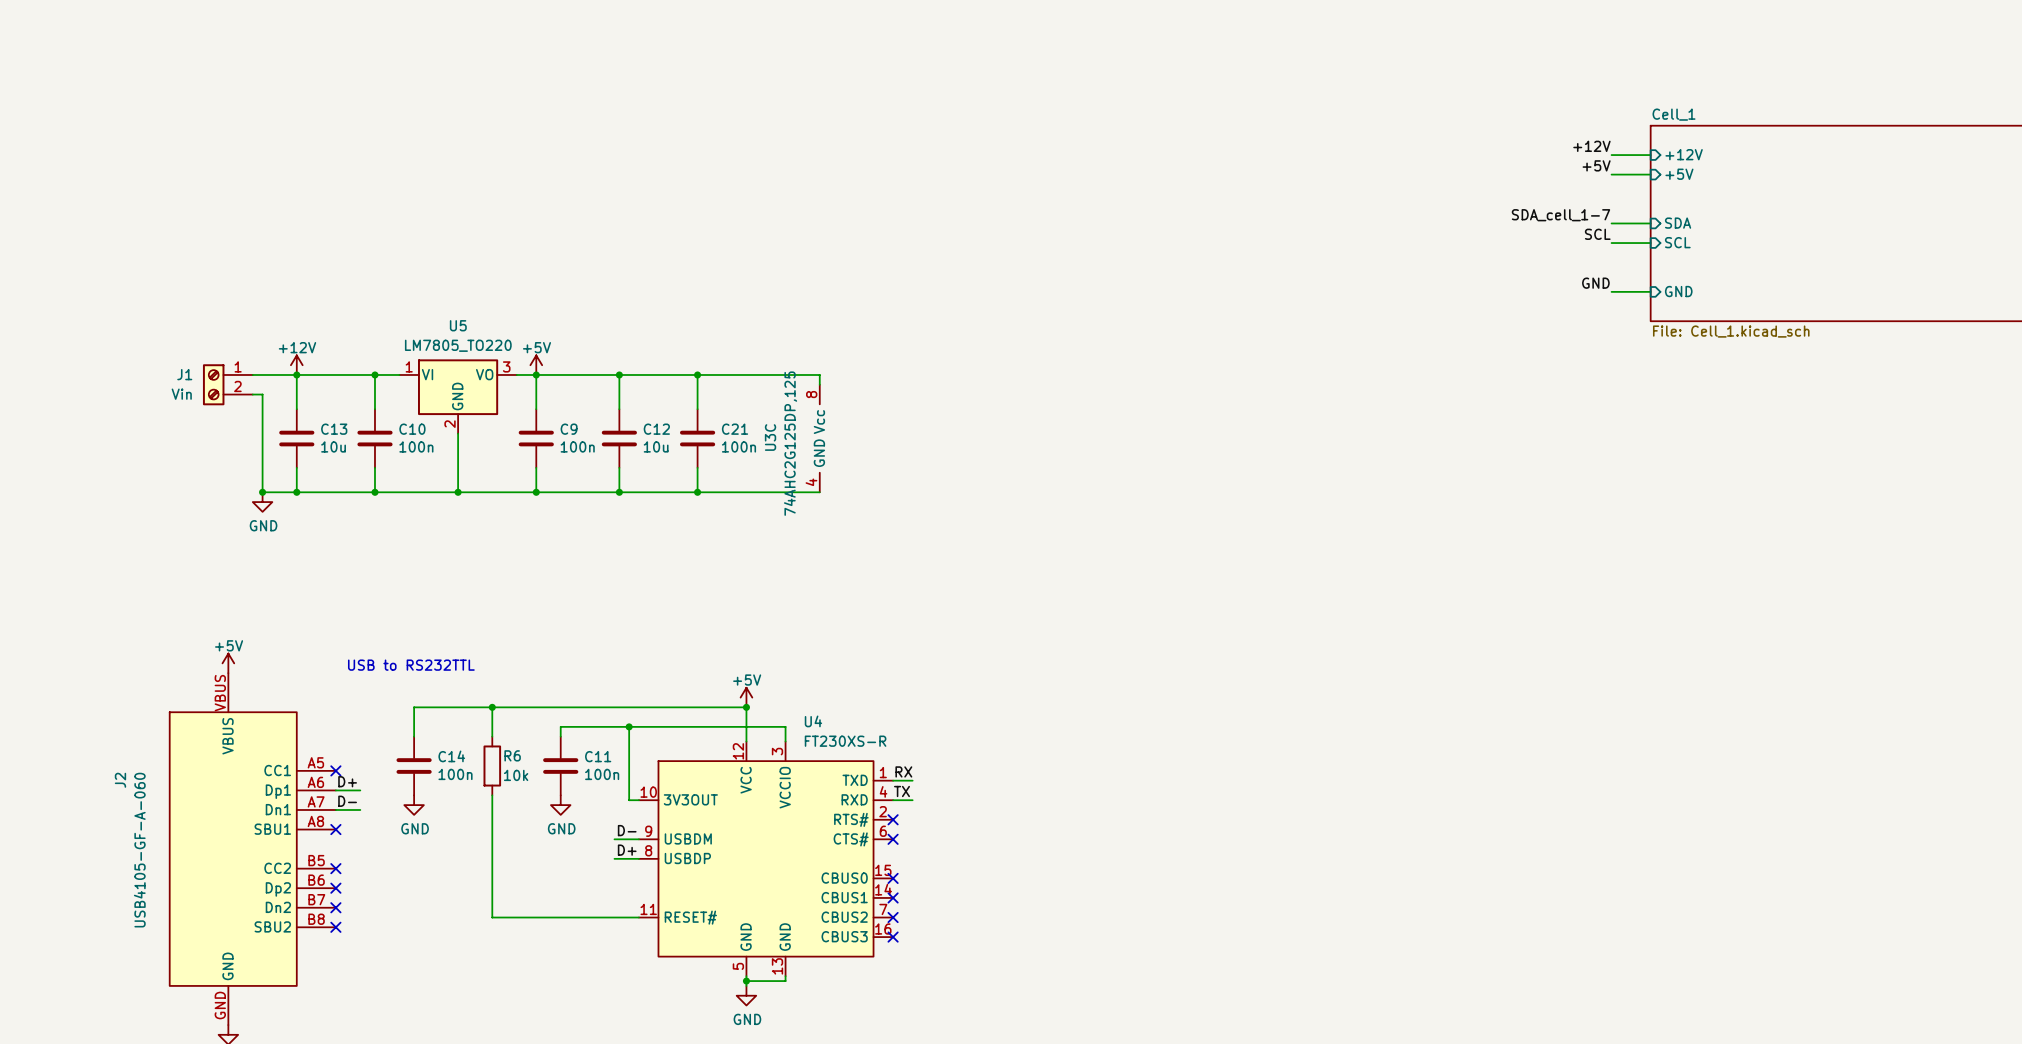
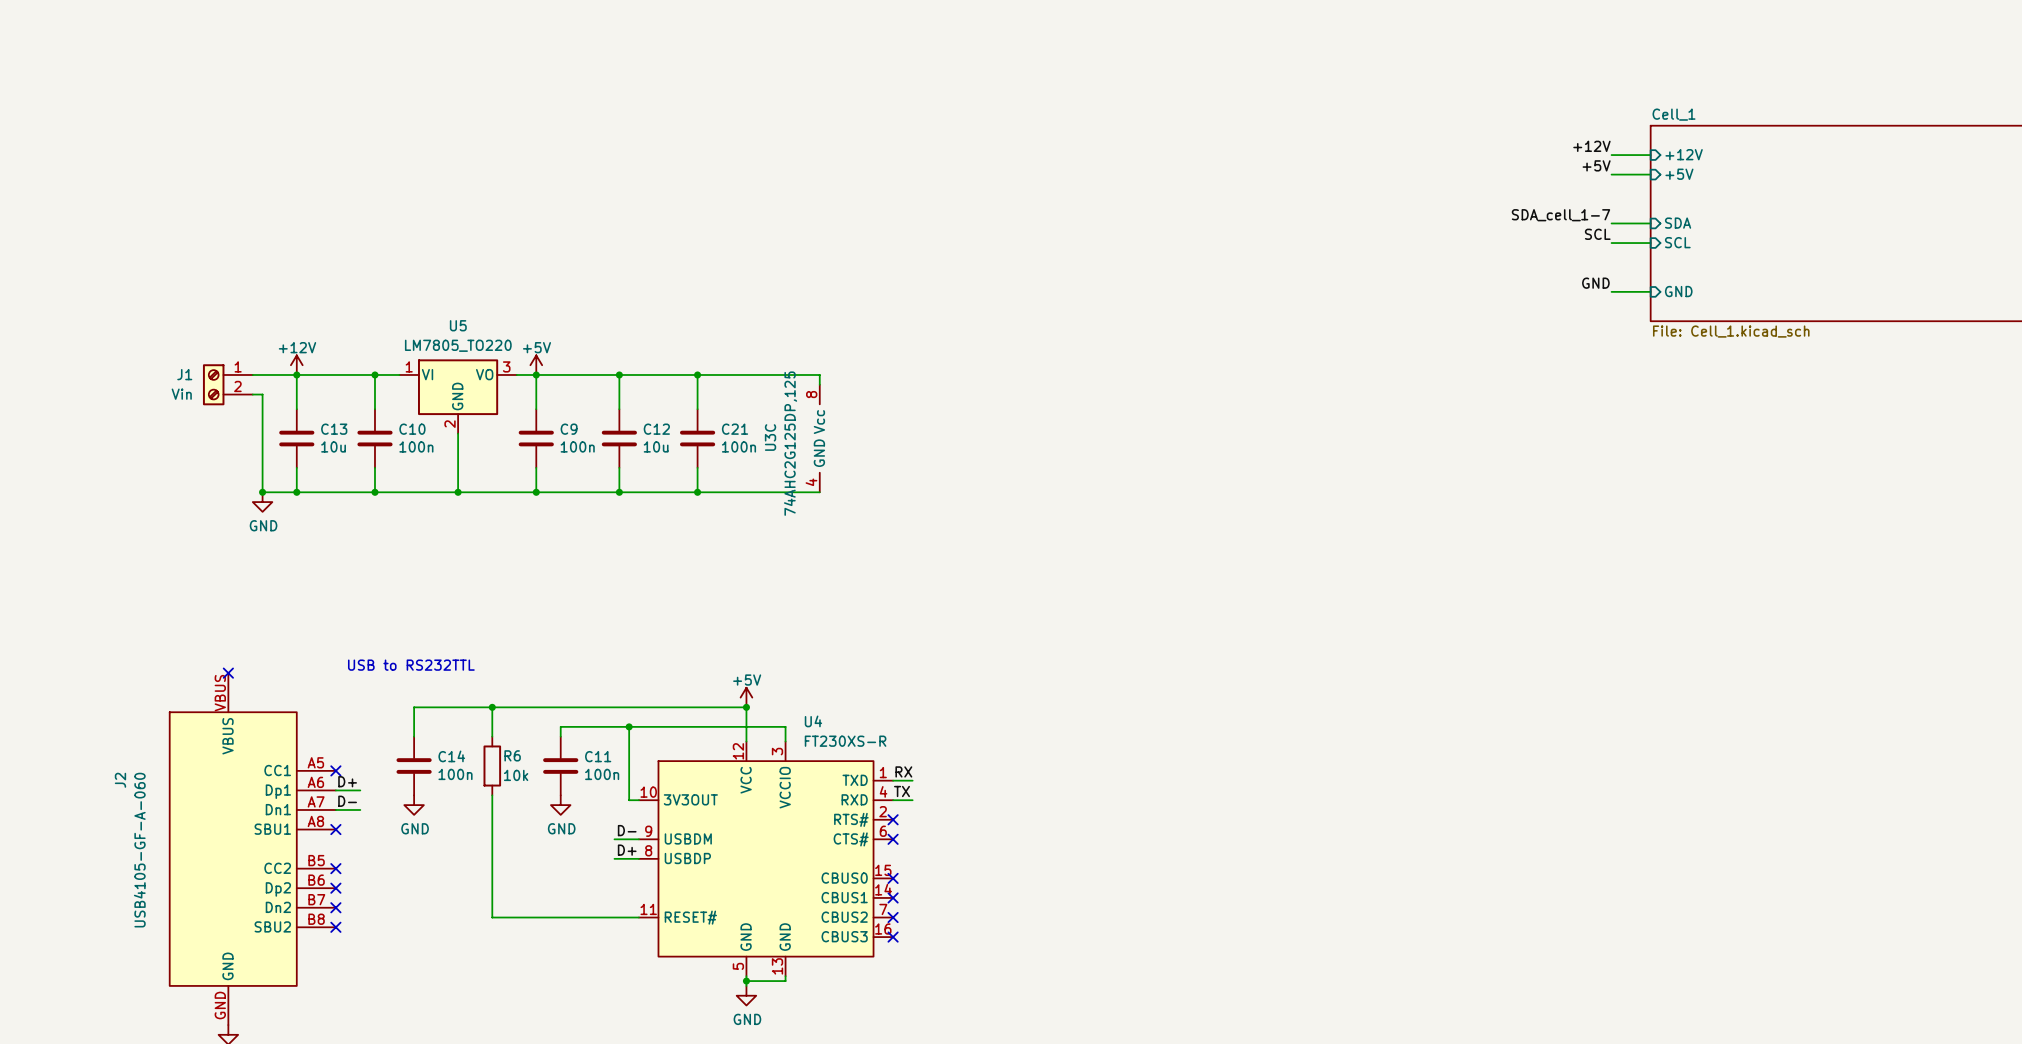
power symbol: +5V (228, 663) -> none
no-connect mark: none -> (228, 673)

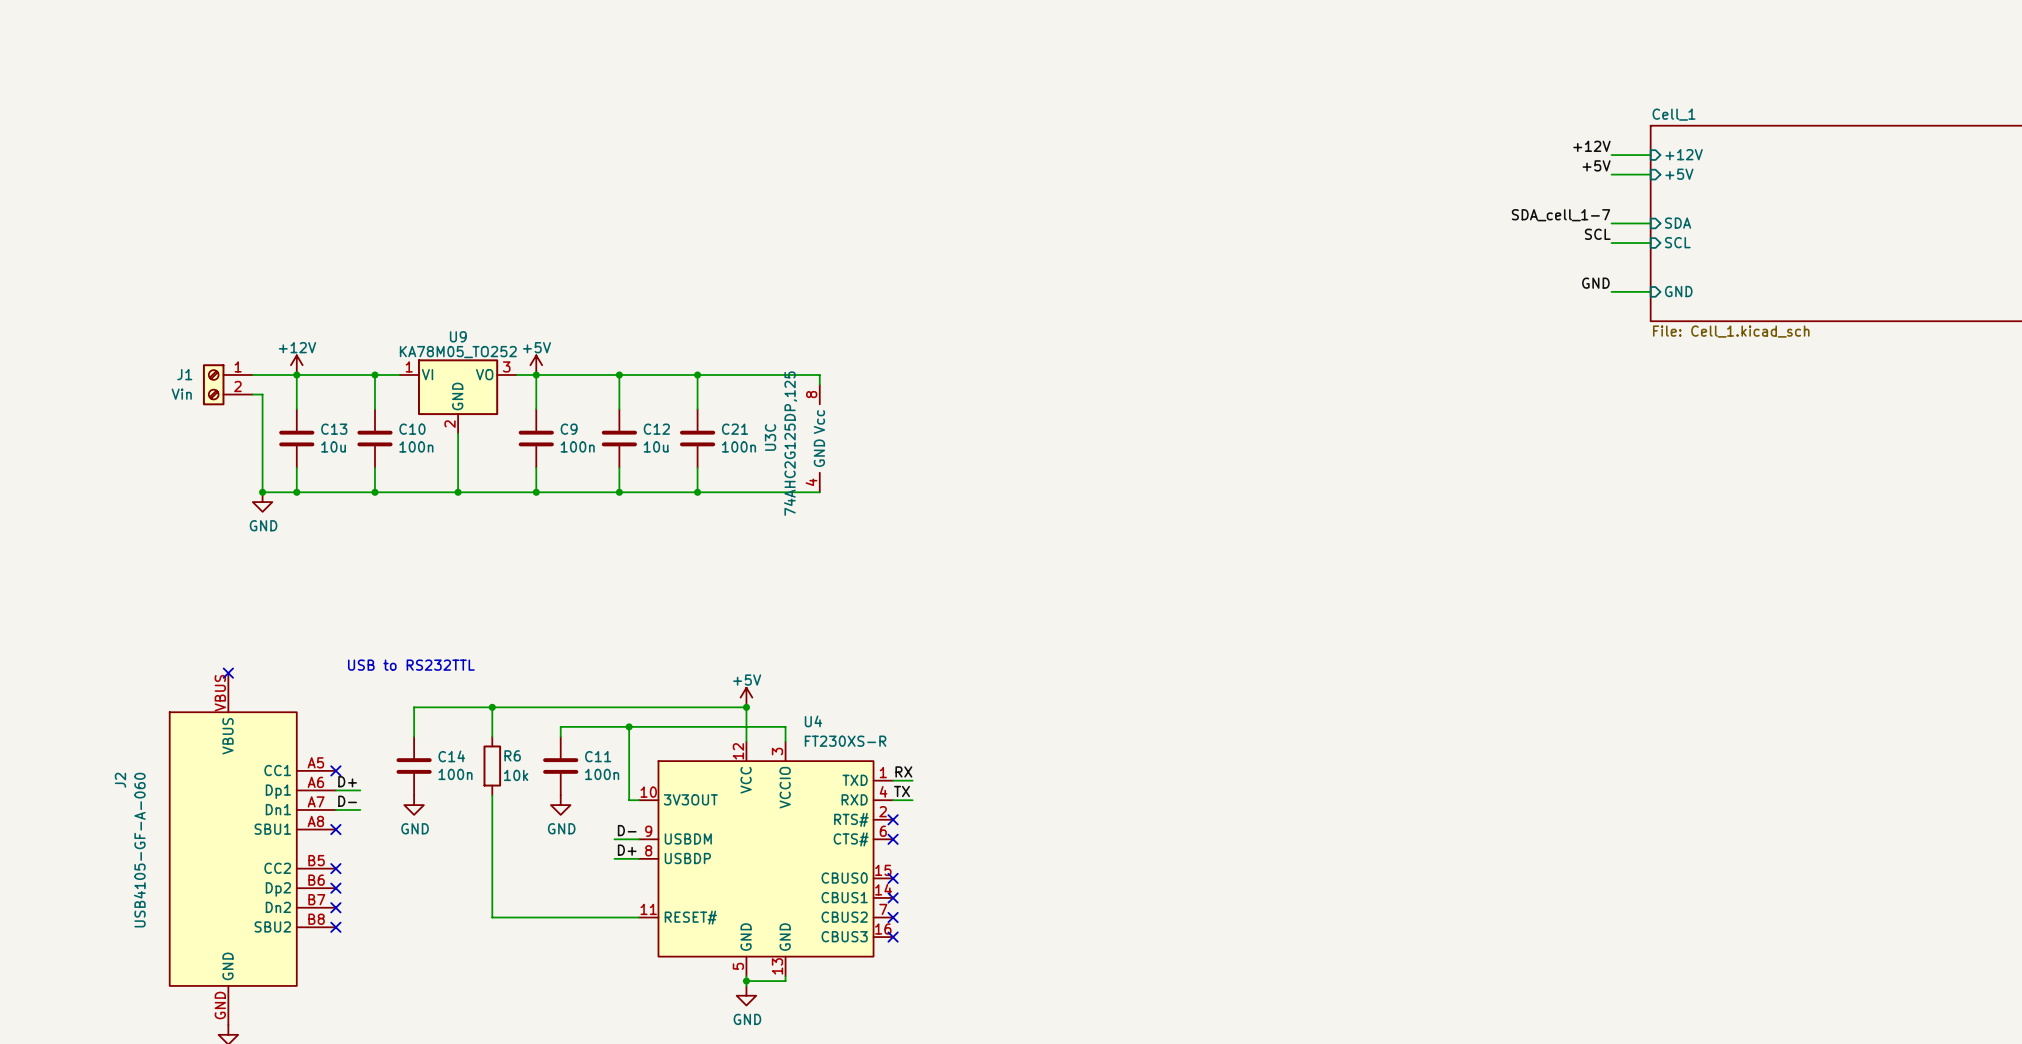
U5 name: U5 (458, 325) -> U9 (458, 336)
U5 value: LM7805_TO220 (458, 345) -> KA78M05_TO252 (458, 352)

